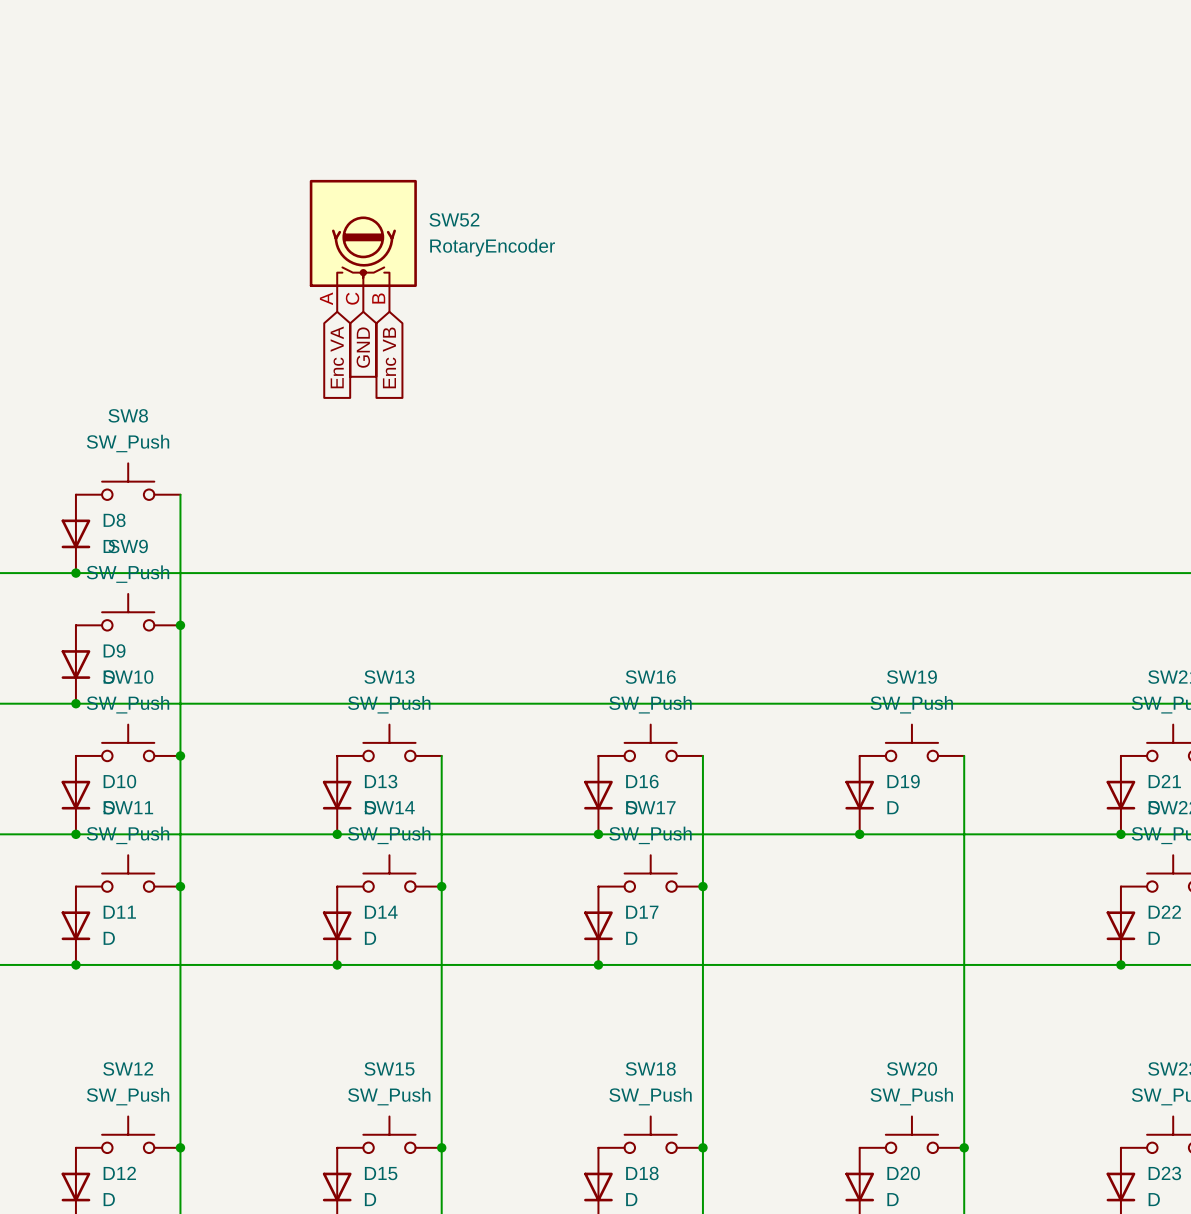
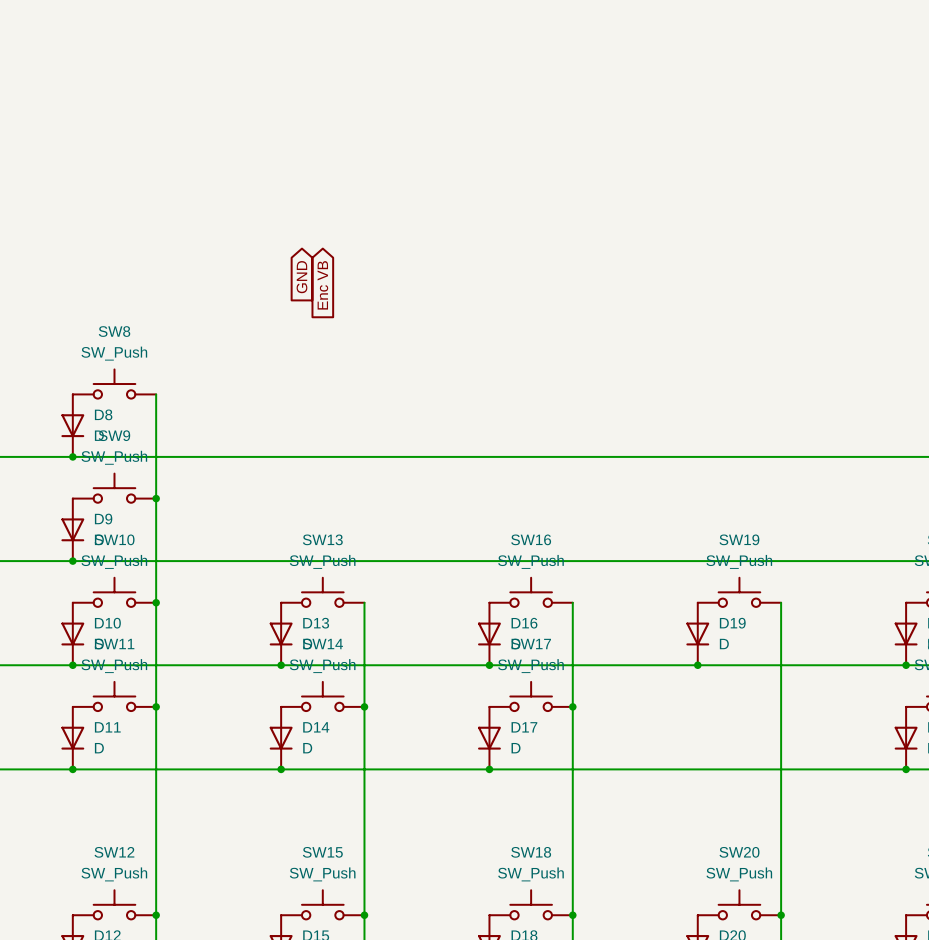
SW52: RotaryEncoder (363, 245) -> none
global label: Enc VA (337, 357) -> none

